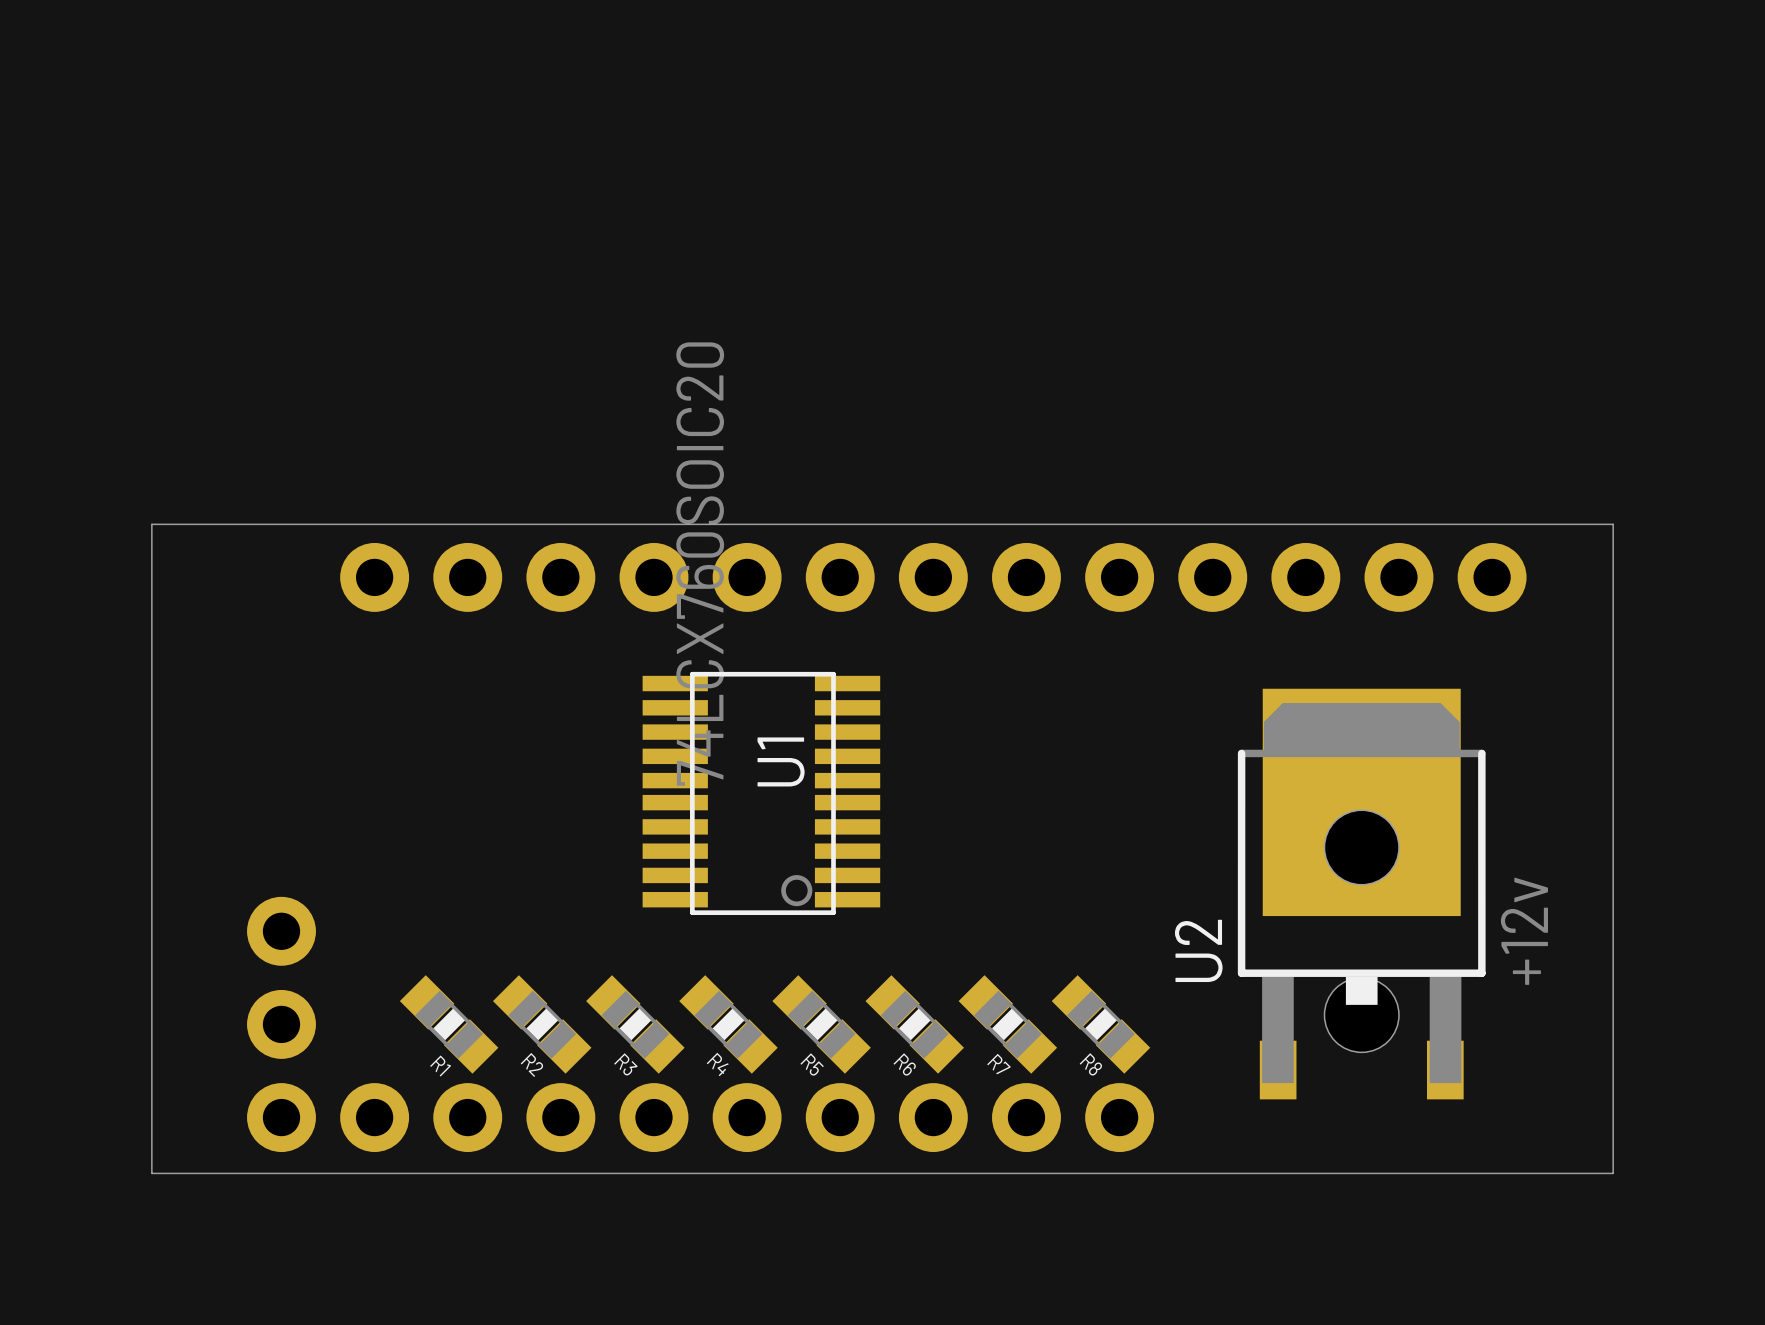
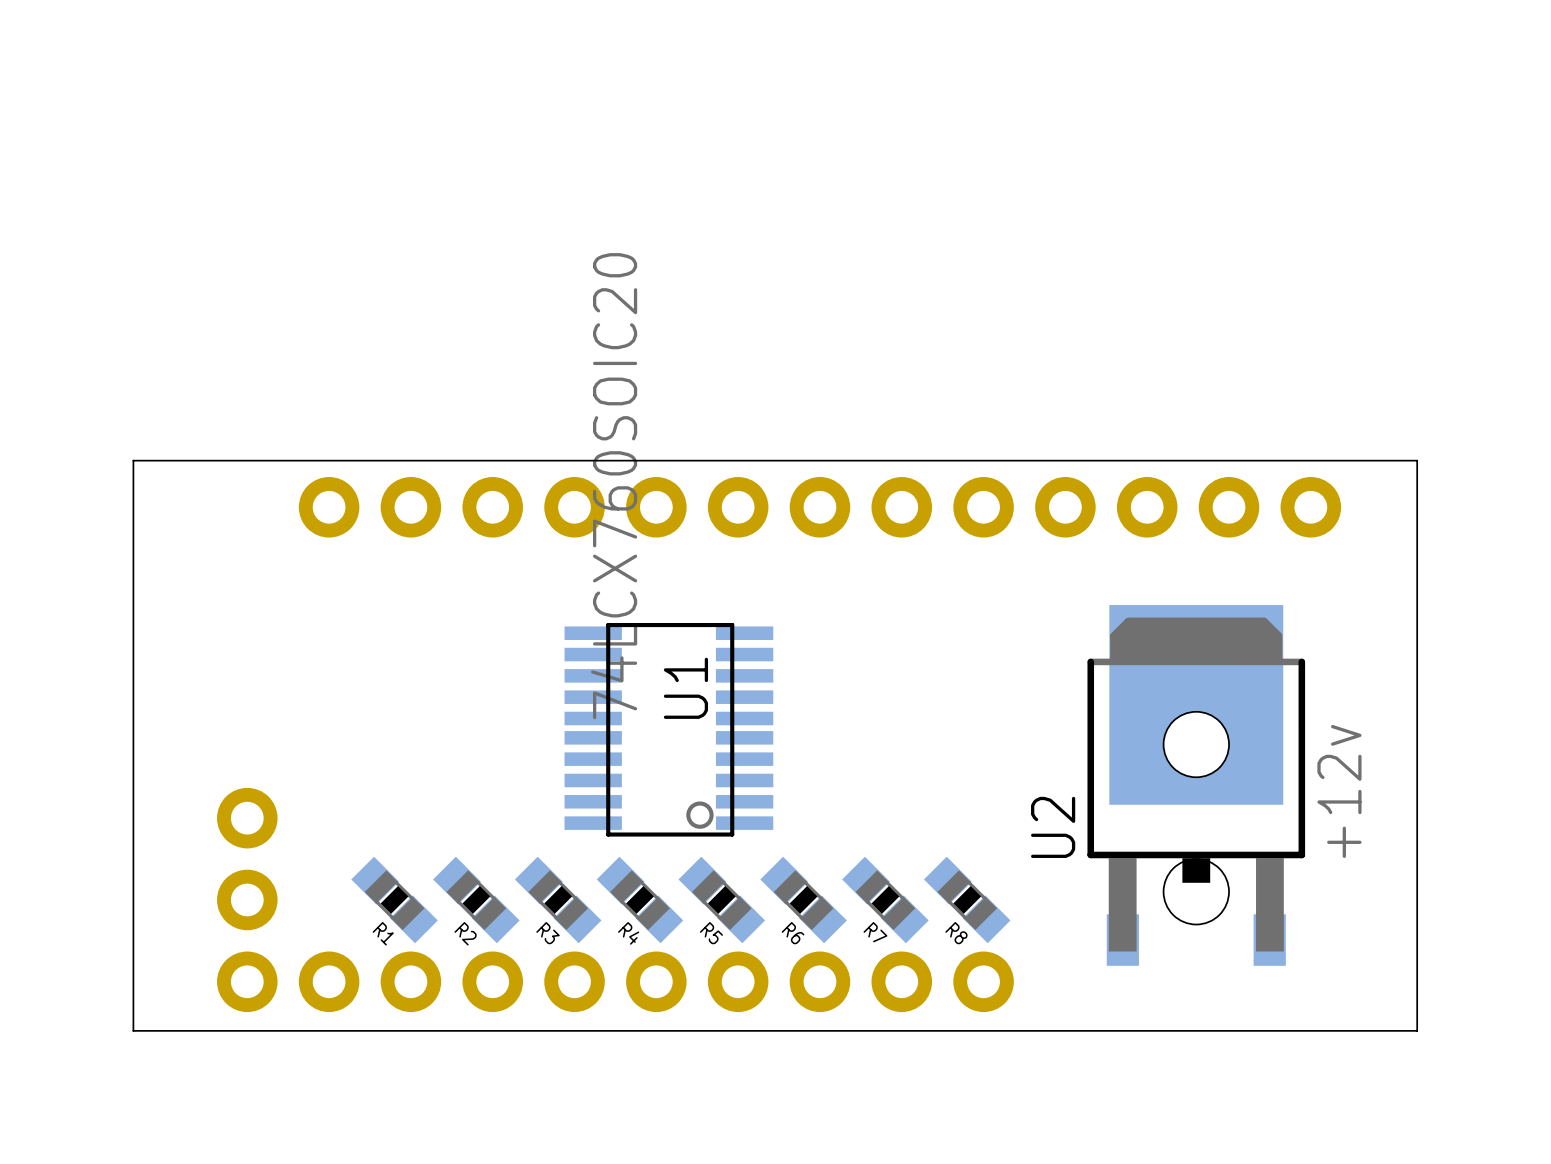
U1 position: (761, 793) -> (668, 729)

